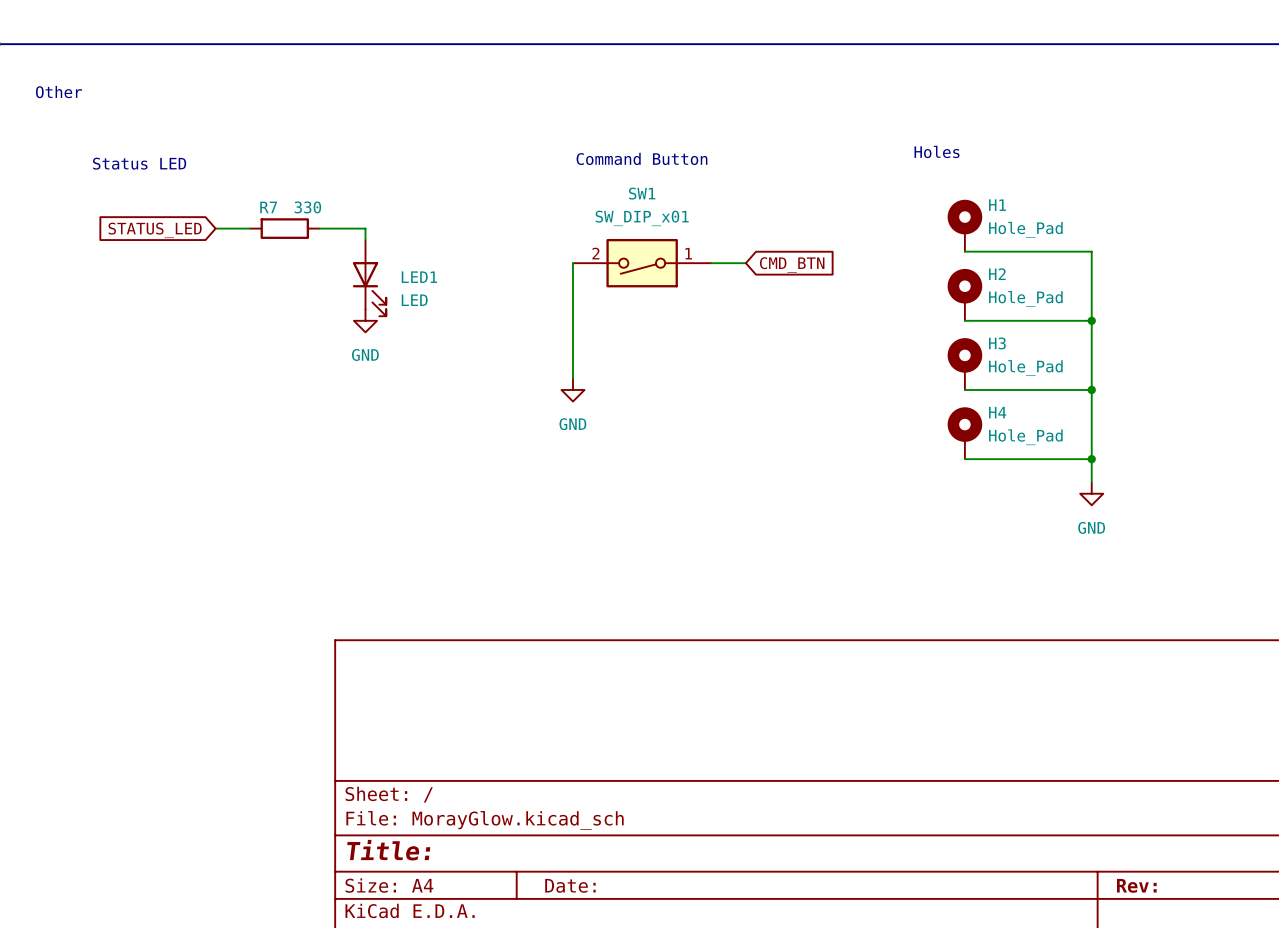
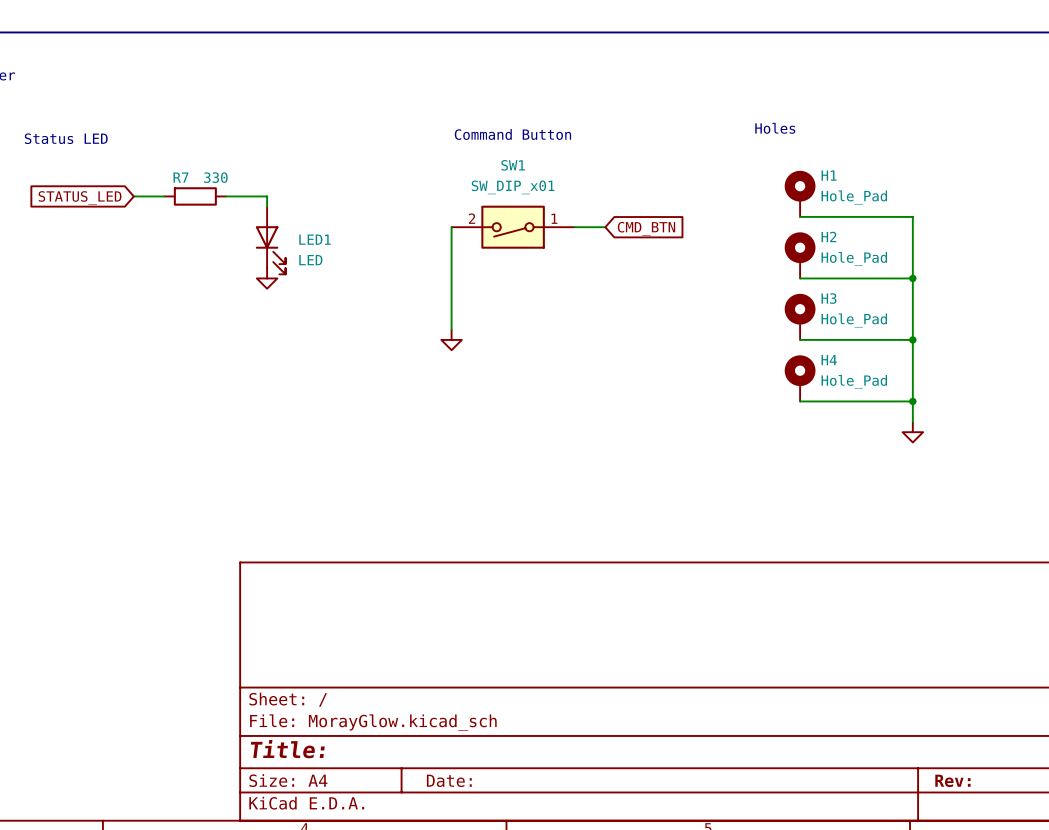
power symbol text: GND (365, 354) -> none
power symbol text: GND (572, 424) -> none
power symbol text: GND (1091, 527) -> none

